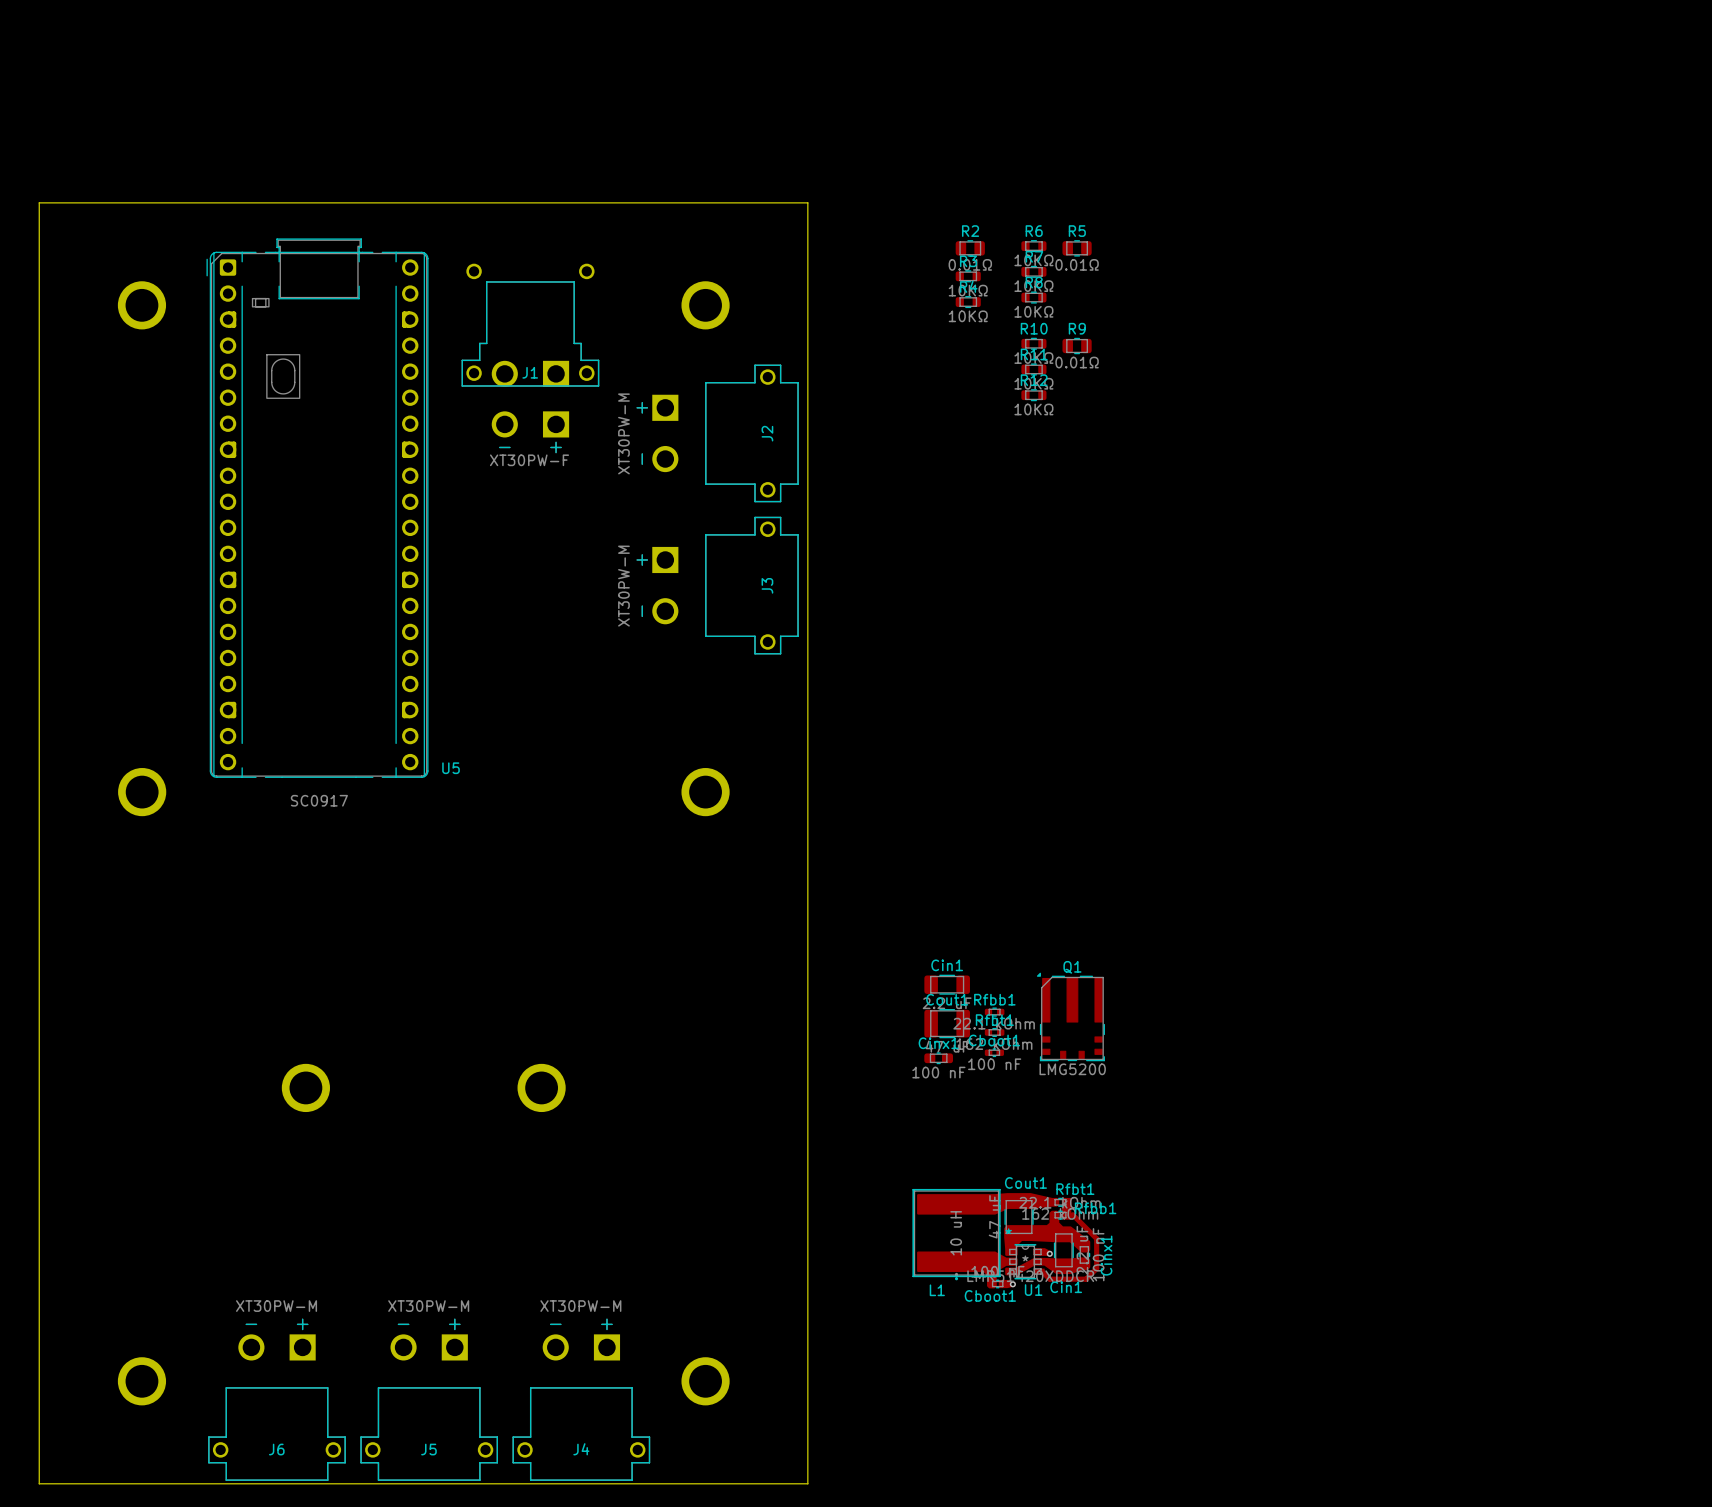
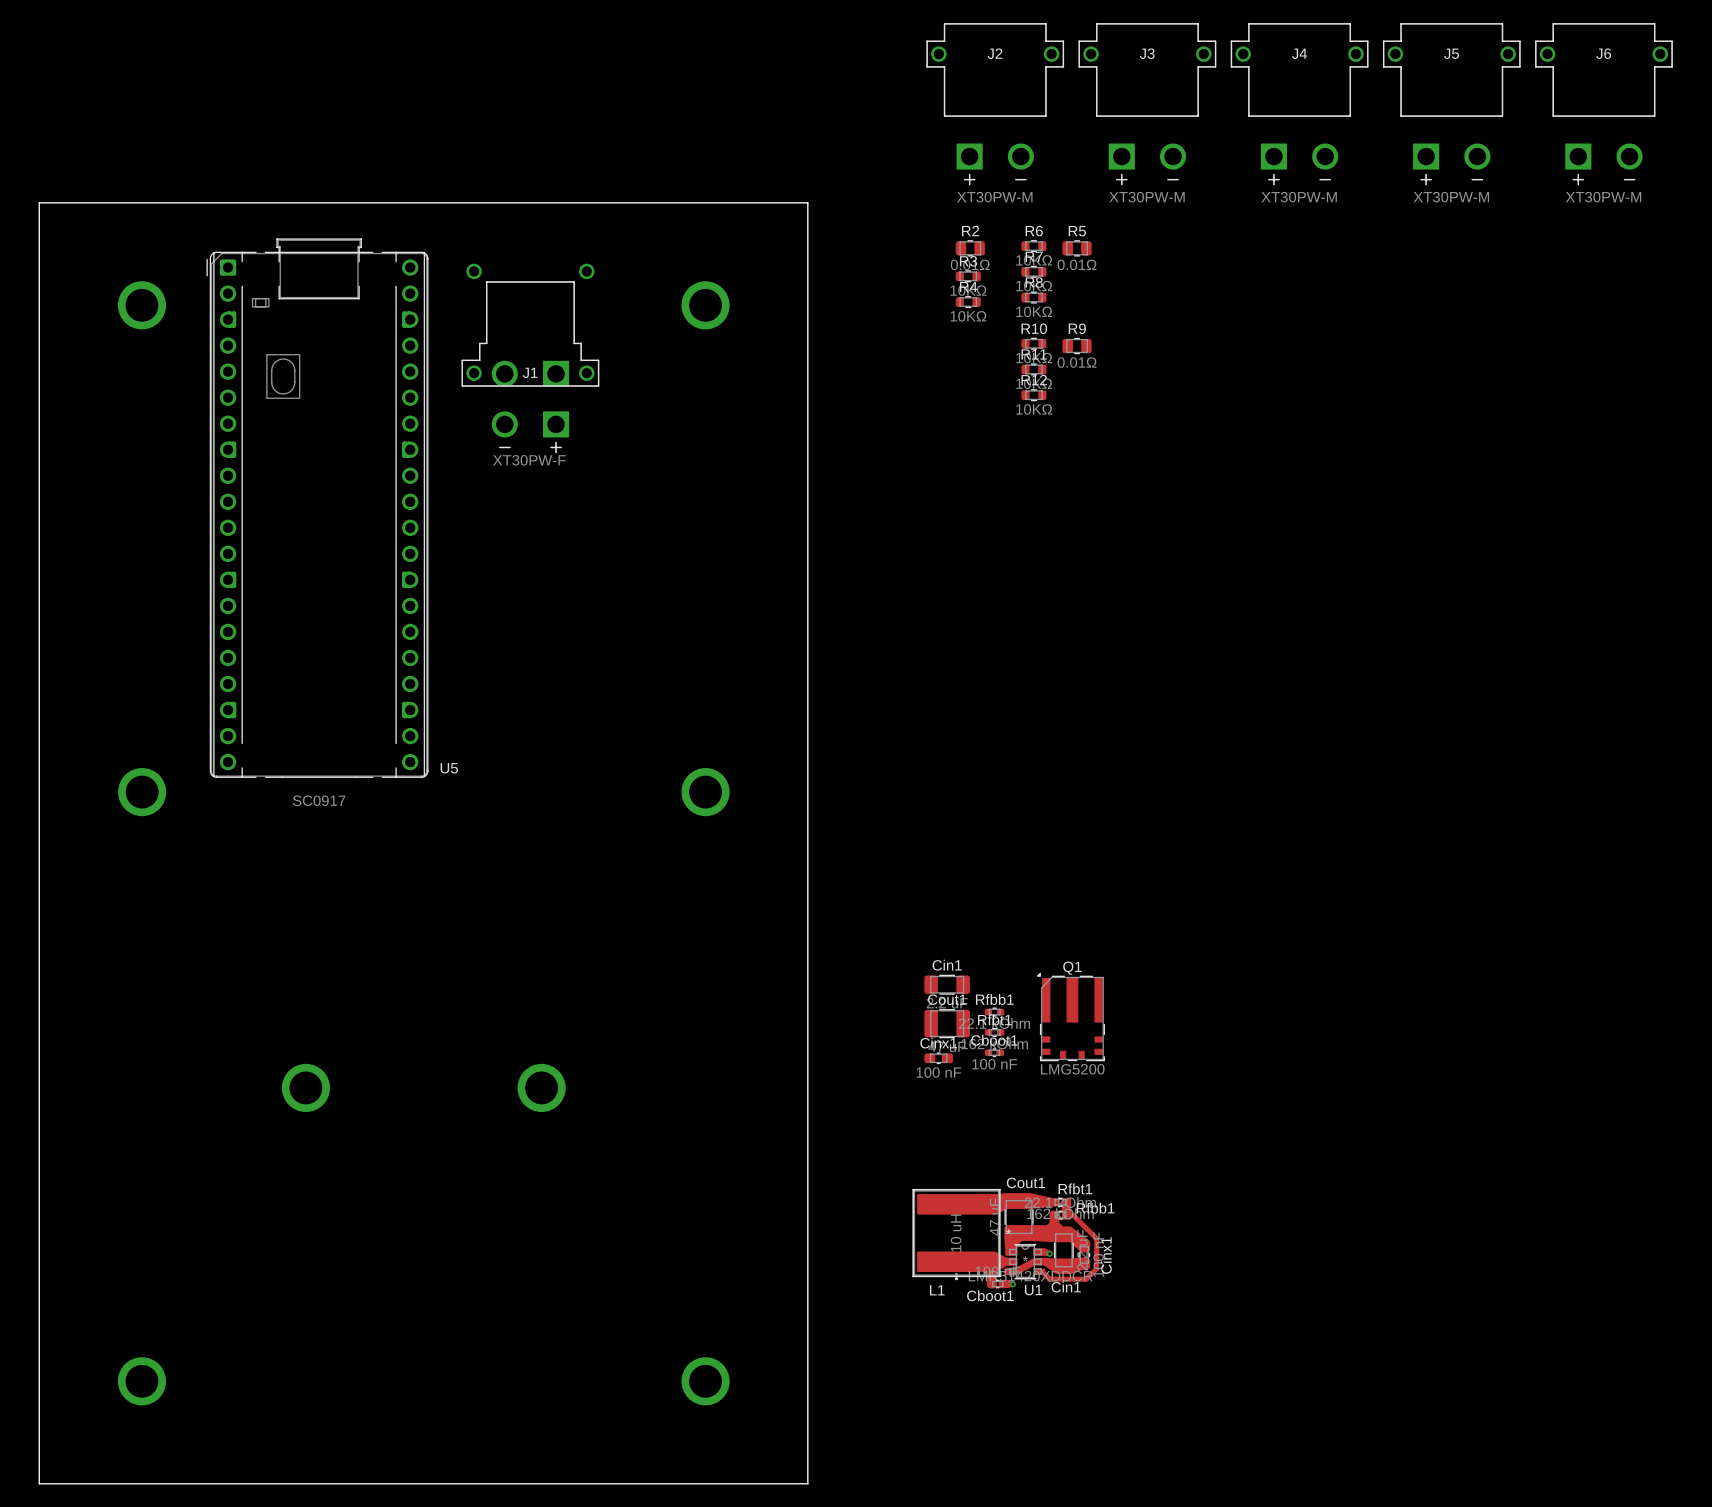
J2 rotation: 0° (717, 433) -> 90° counterclockwise (995, 104)
J2 position: (717, 433) -> (995, 104)
J3 rotation: 0° (717, 585) -> 90° counterclockwise (1147, 104)
J3 position: (717, 585) -> (1147, 104)
J6 rotation: 0° (277, 1399) -> 180° (1603, 104)
J6 position: (277, 1399) -> (1603, 104)
J5 rotation: 0° (429, 1399) -> 180° (1451, 104)
J5 position: (429, 1399) -> (1451, 104)
J4 rotation: 0° (581, 1399) -> 180° (1299, 104)
J4 position: (581, 1399) -> (1299, 104)

